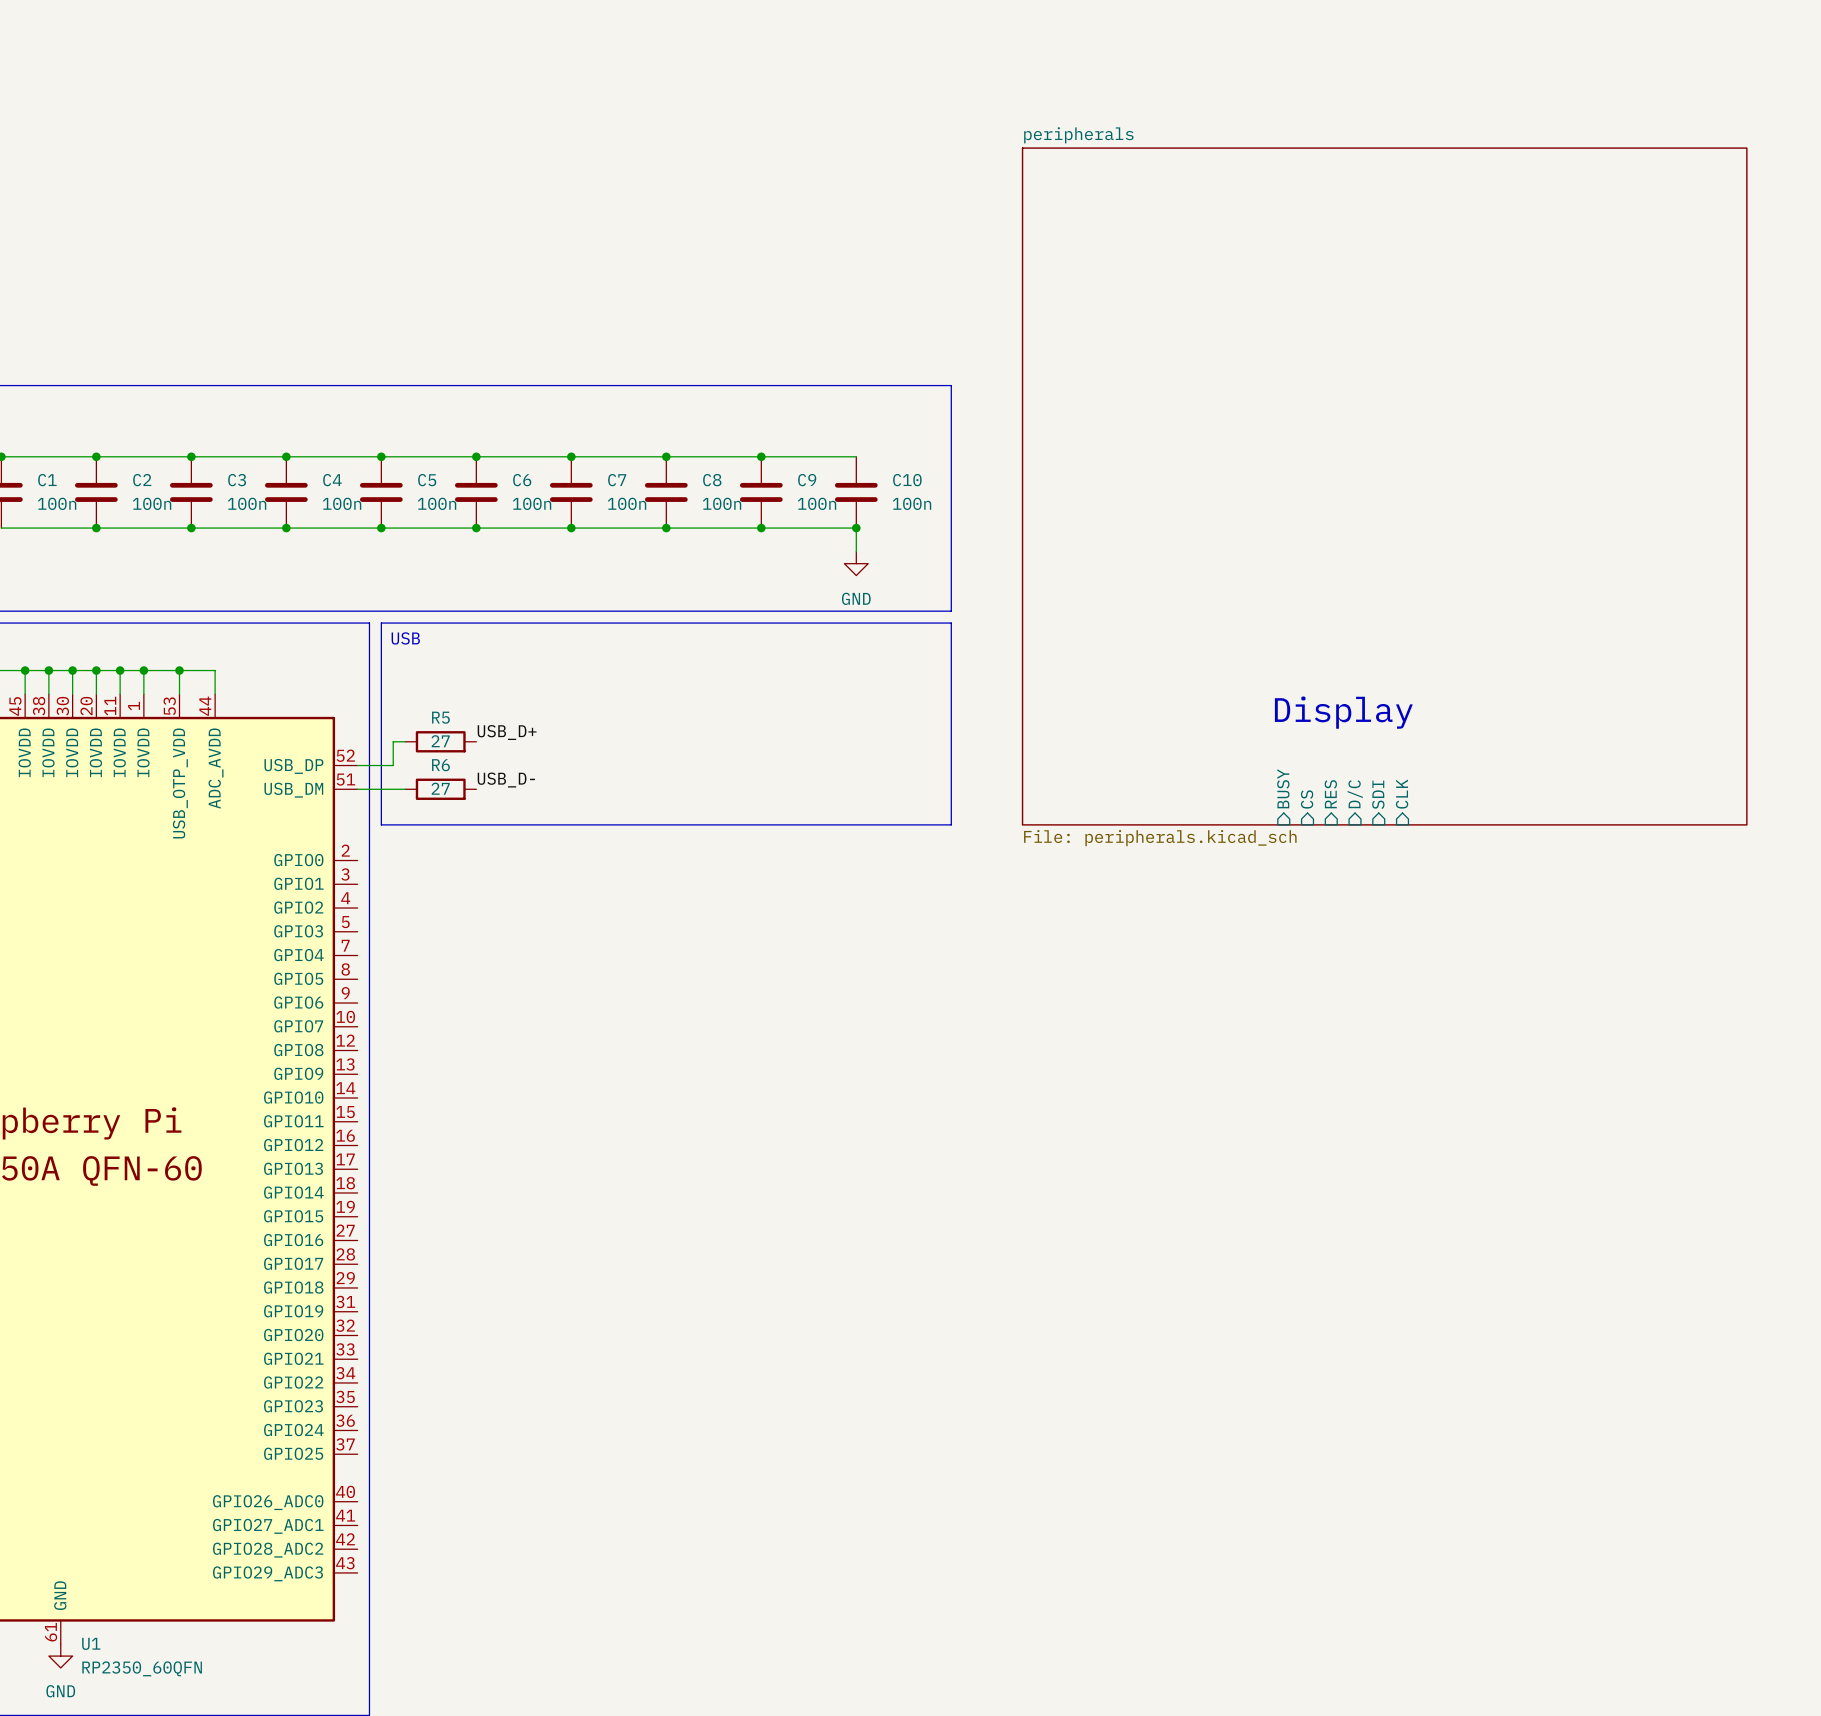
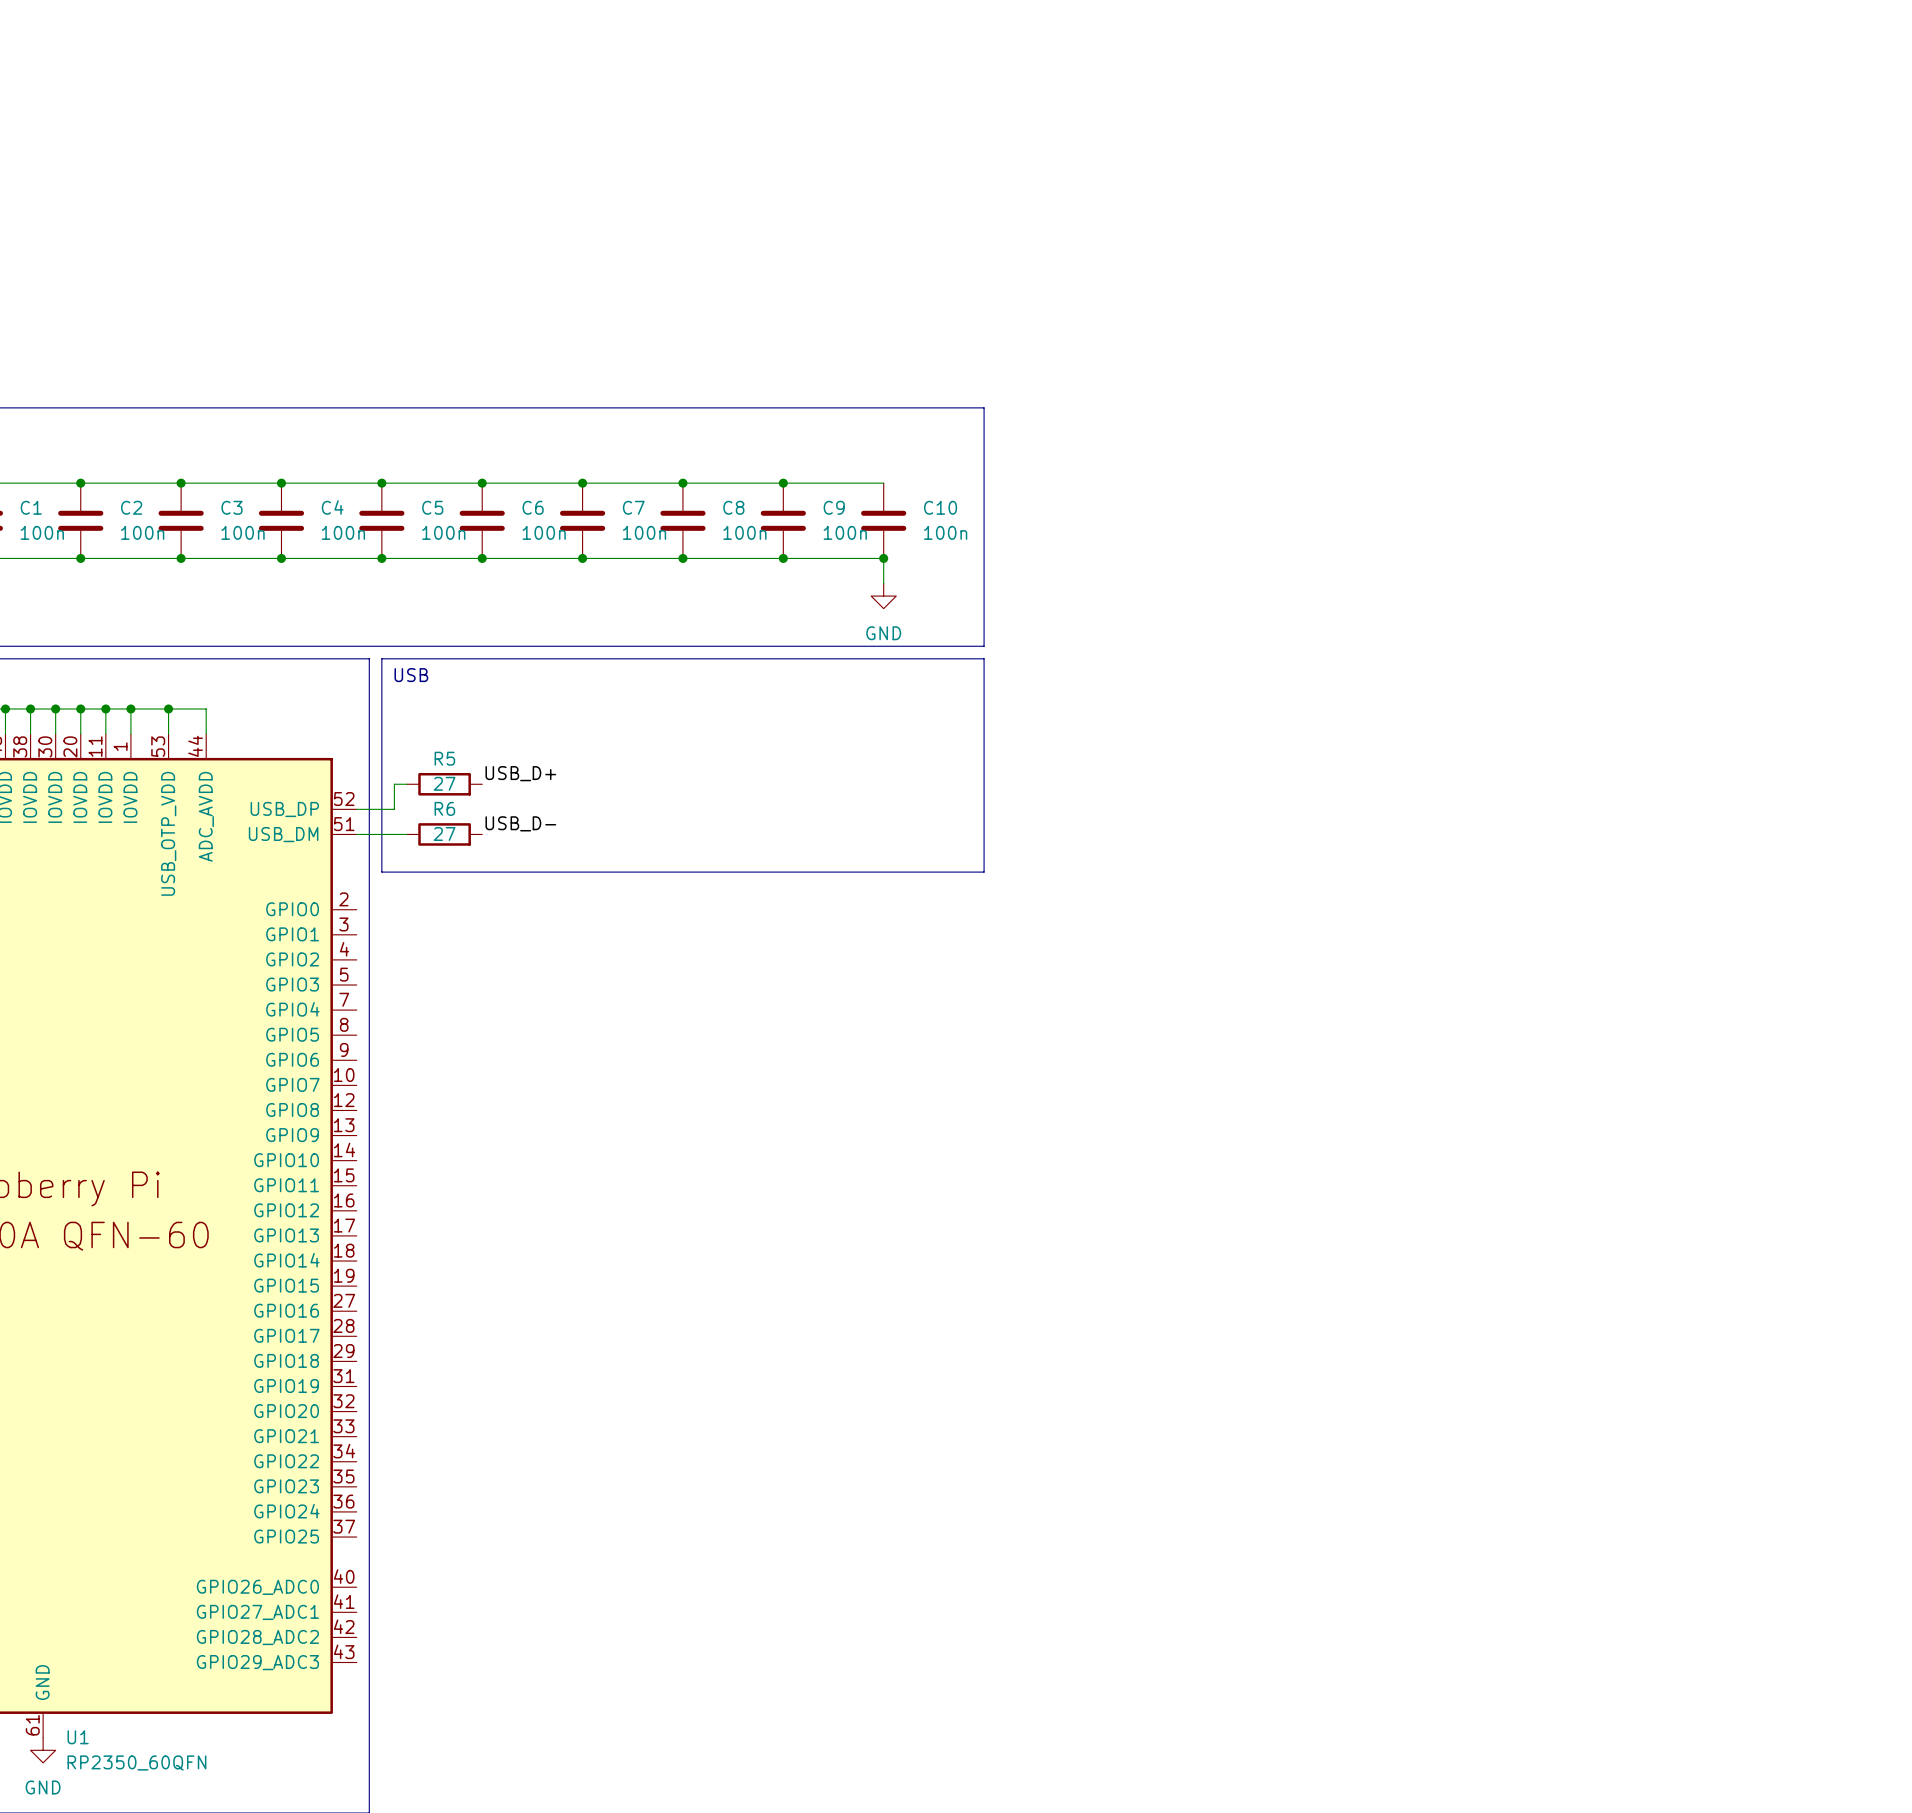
sheet peripherals: File: peripherals.kicad_sch (1384, 486) -> none
text: Display (1343, 712) -> none
sheet pin: BUSY (1283, 788) -> none
sheet pin: RES (1330, 794) -> none
sheet pin: D/C (1355, 794) -> none
sheet pin: SDI (1378, 794) -> none
sheet pin: CLK (1402, 794) -> none
sheet pin: CS (1307, 799) -> none

